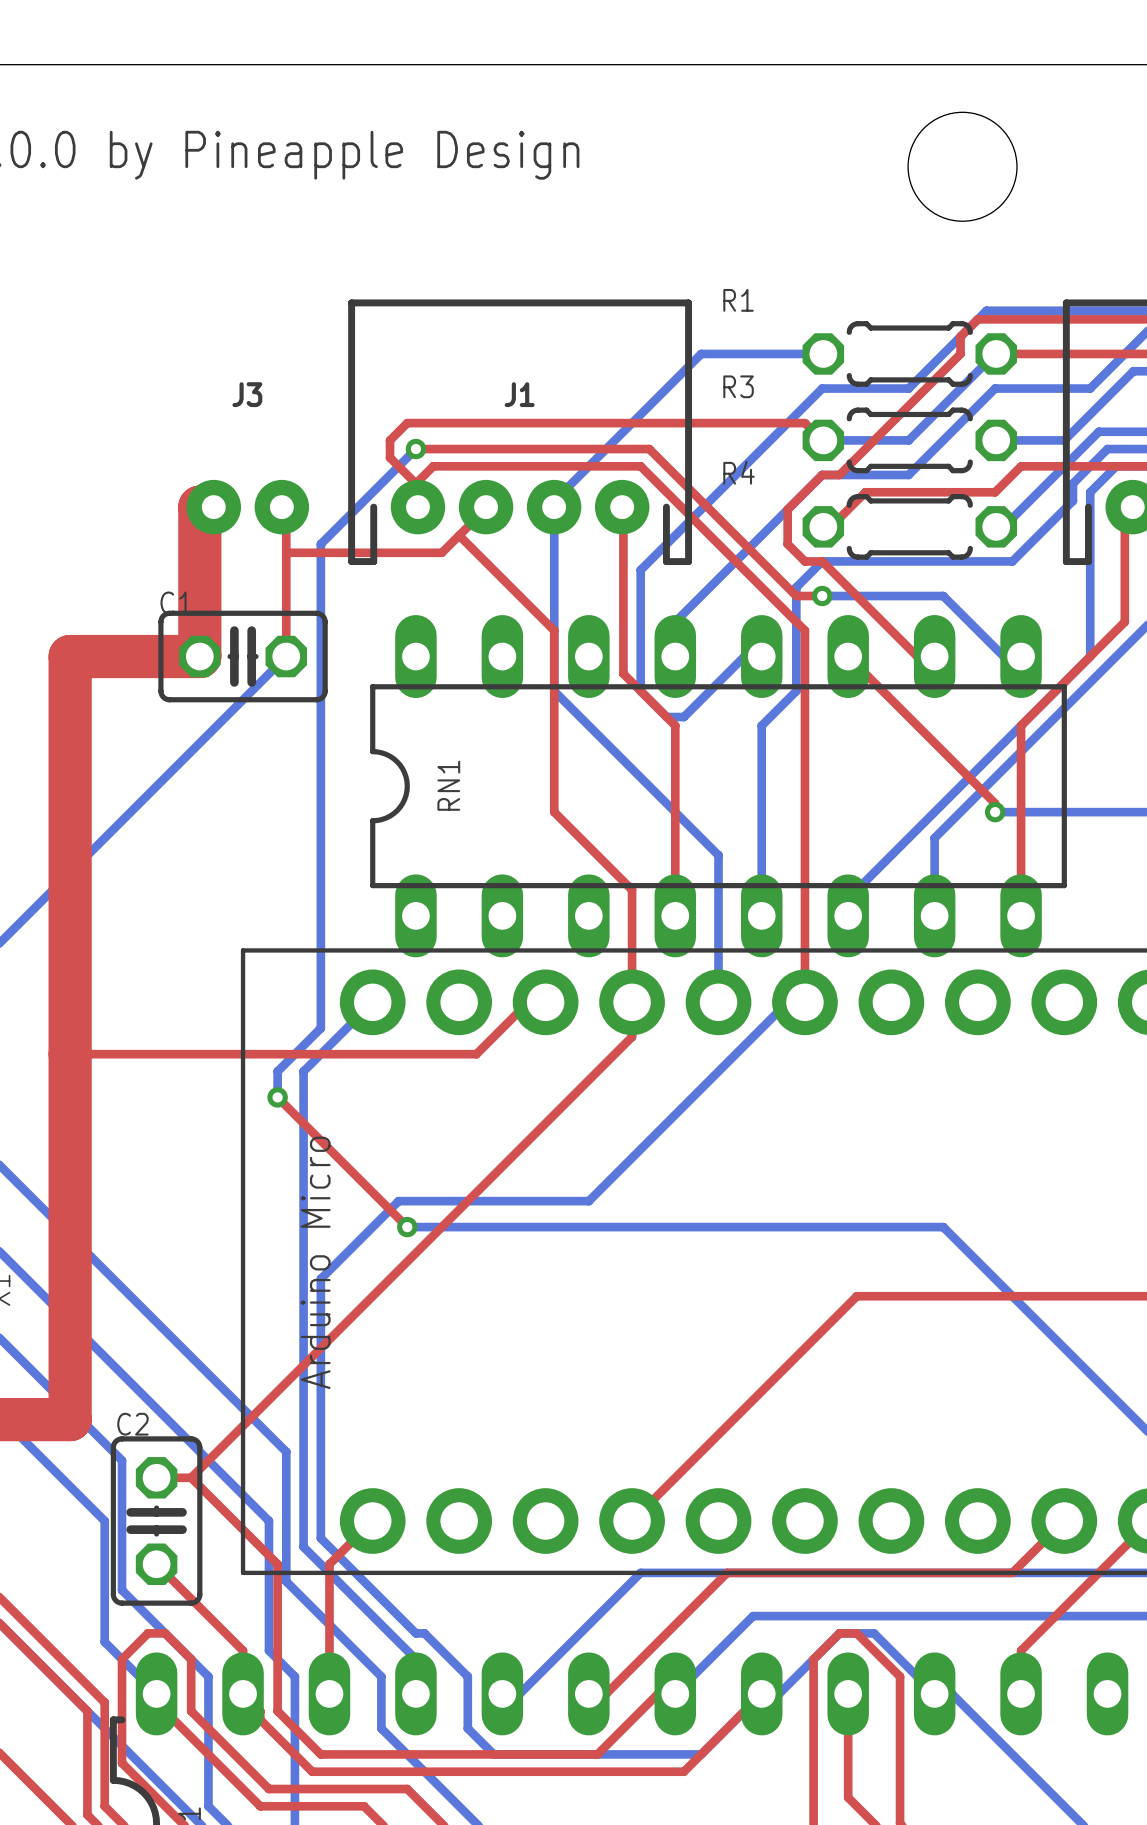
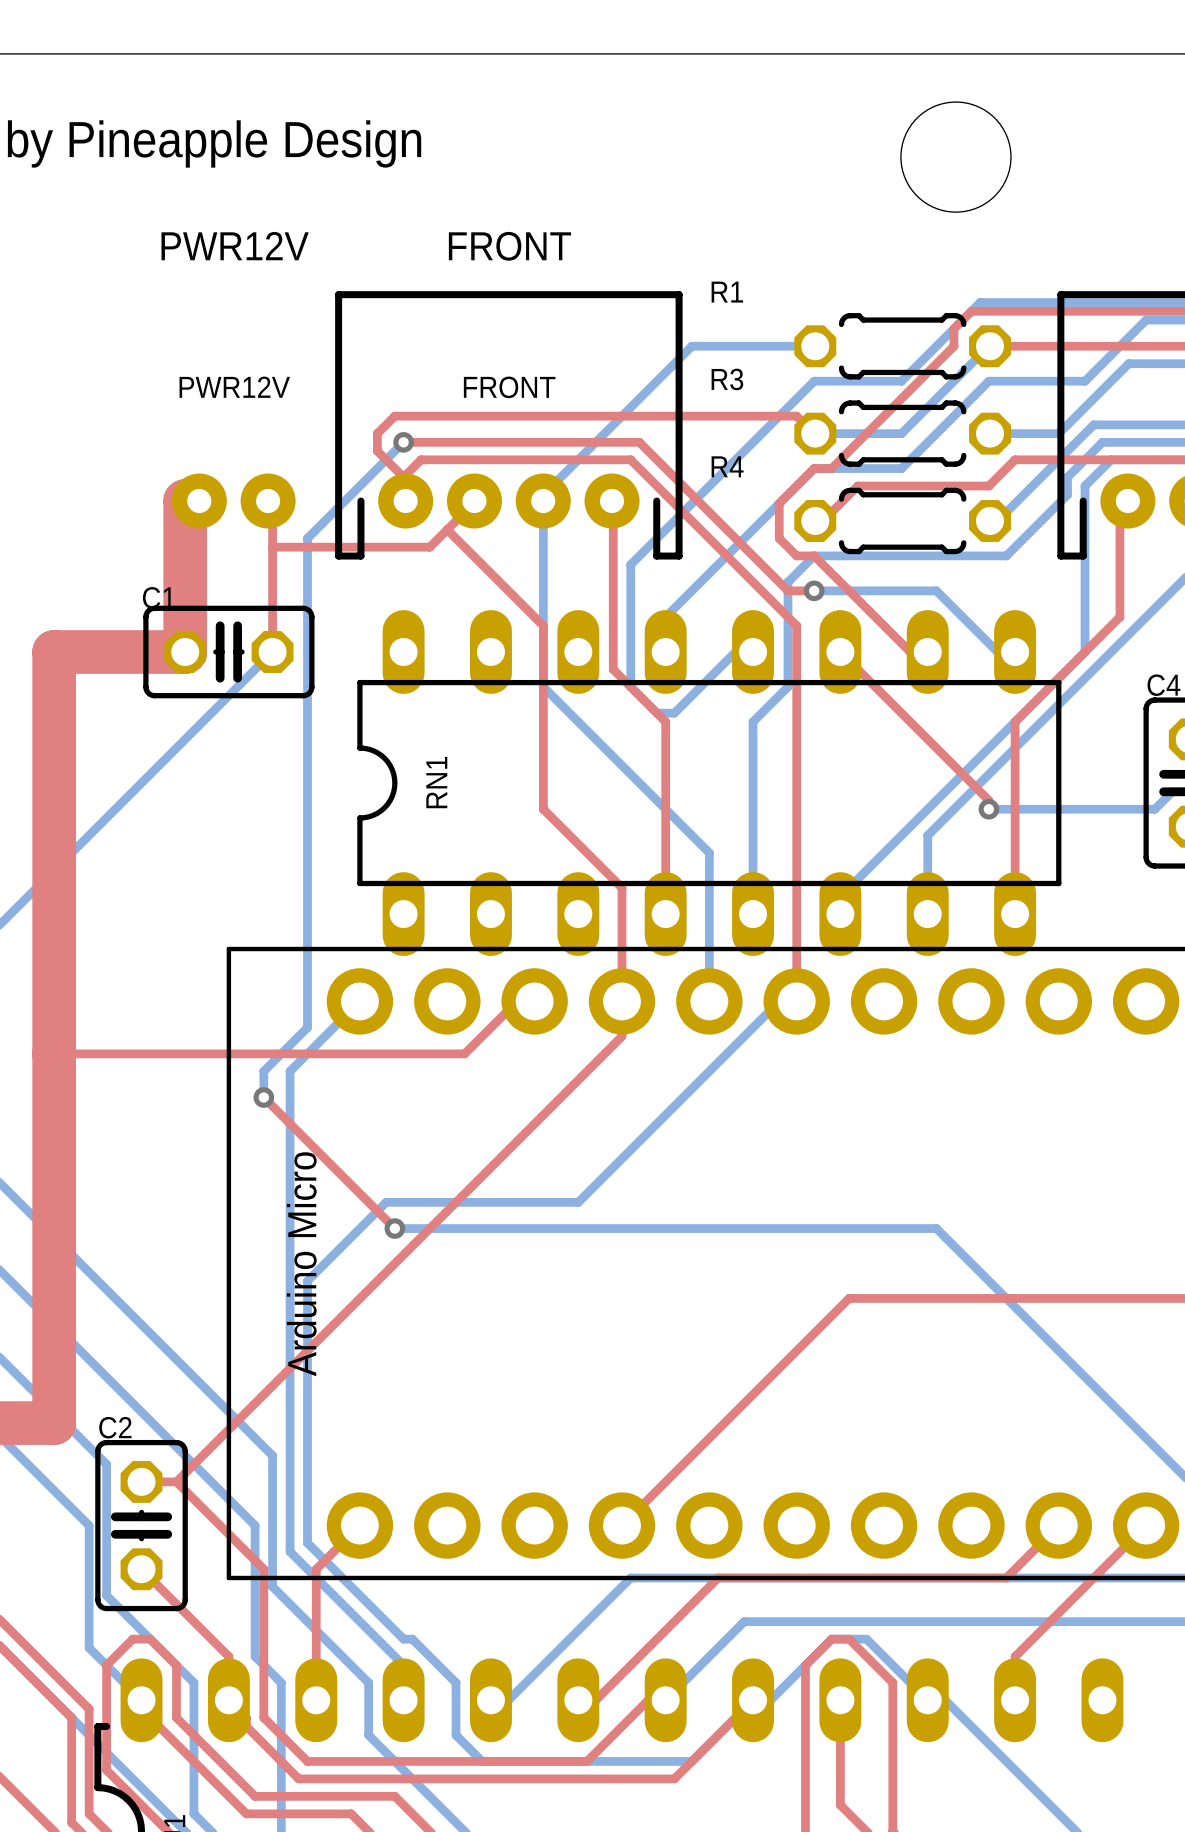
text: none -> PWR12V (235, 246)
text: none -> FRONT (509, 246)
J3 name: J3 (247, 394) -> PWR12V (234, 387)
J1 name: J1 (519, 394) -> FRONT (509, 387)

